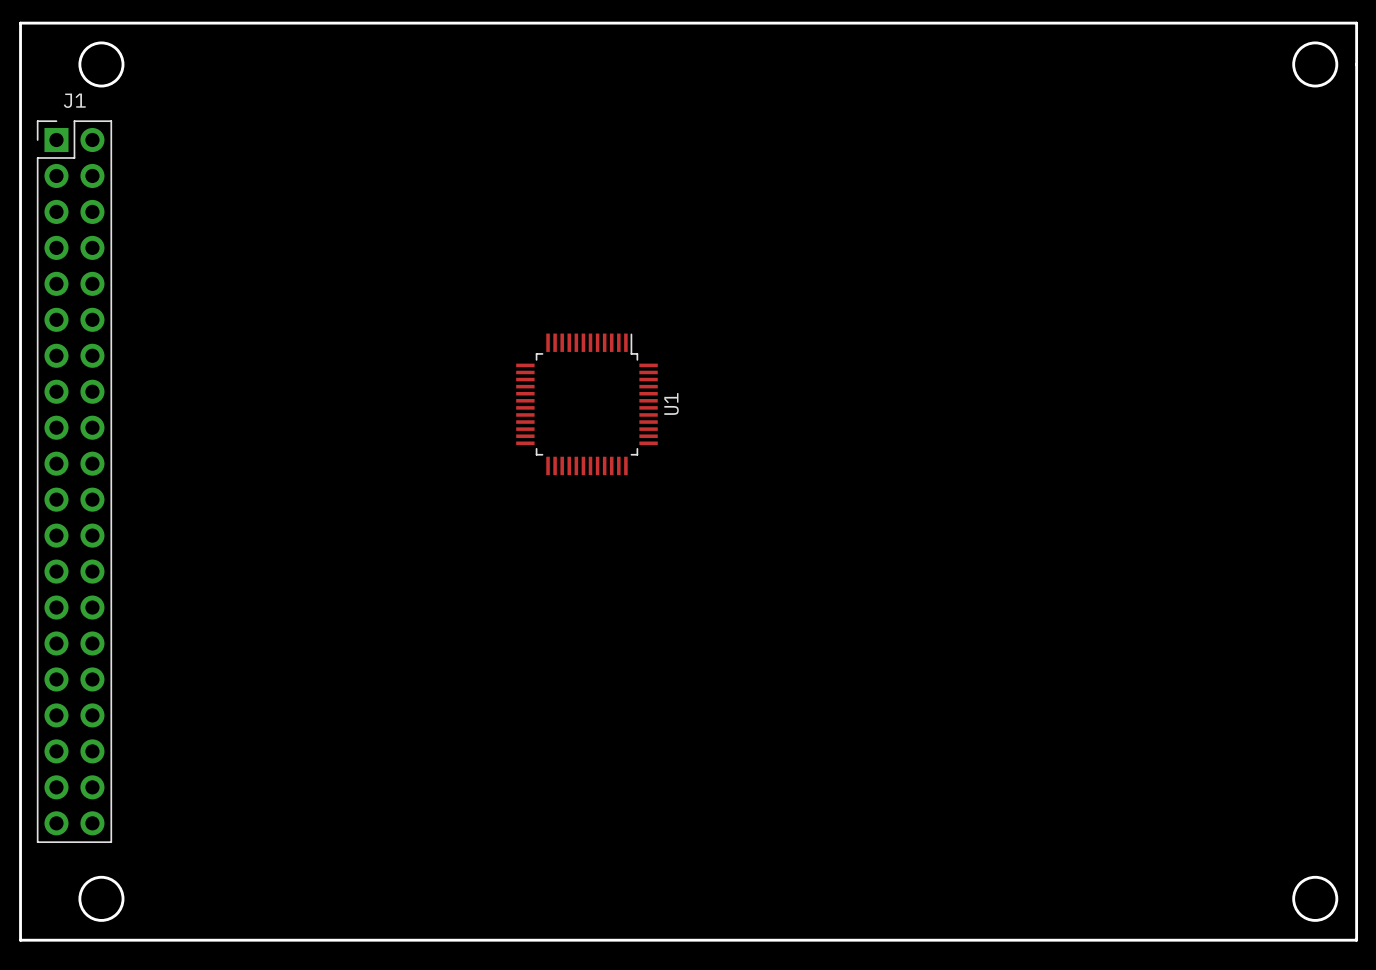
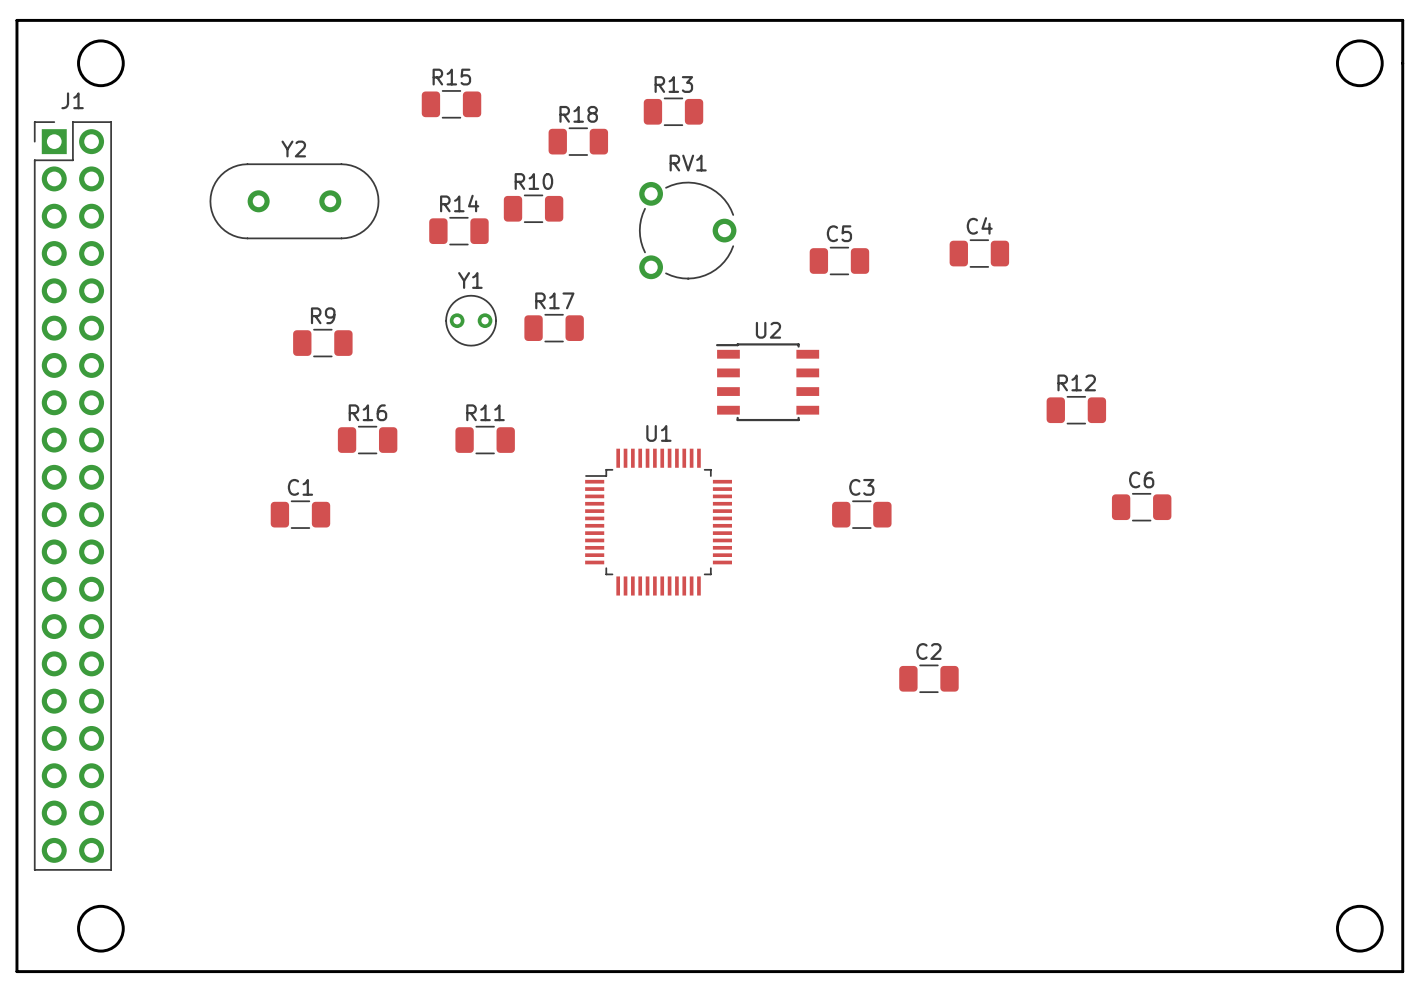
R15: none -> (451, 104)
R13: none -> (673, 111)
R18: none -> (578, 141)
Y2: none -> (294, 201)
R10: none -> (533, 208)
RV1: none -> (687, 230)
R14: none -> (458, 231)
C4: none -> (979, 253)
C5: none -> (839, 261)
Y1: none -> (471, 320)
R17: none -> (554, 328)
R9: none -> (322, 343)
U2: none -> (767, 382)
R12: none -> (1076, 410)
U1 rotation: 0° (586, 404) -> 90° counterclockwise (658, 522)
U1 position: (586, 404) -> (658, 522)
R16: none -> (367, 440)
R11: none -> (485, 440)
C6: none -> (1141, 507)
C1: none -> (300, 514)
C3: none -> (861, 514)
C2: none -> (928, 678)

